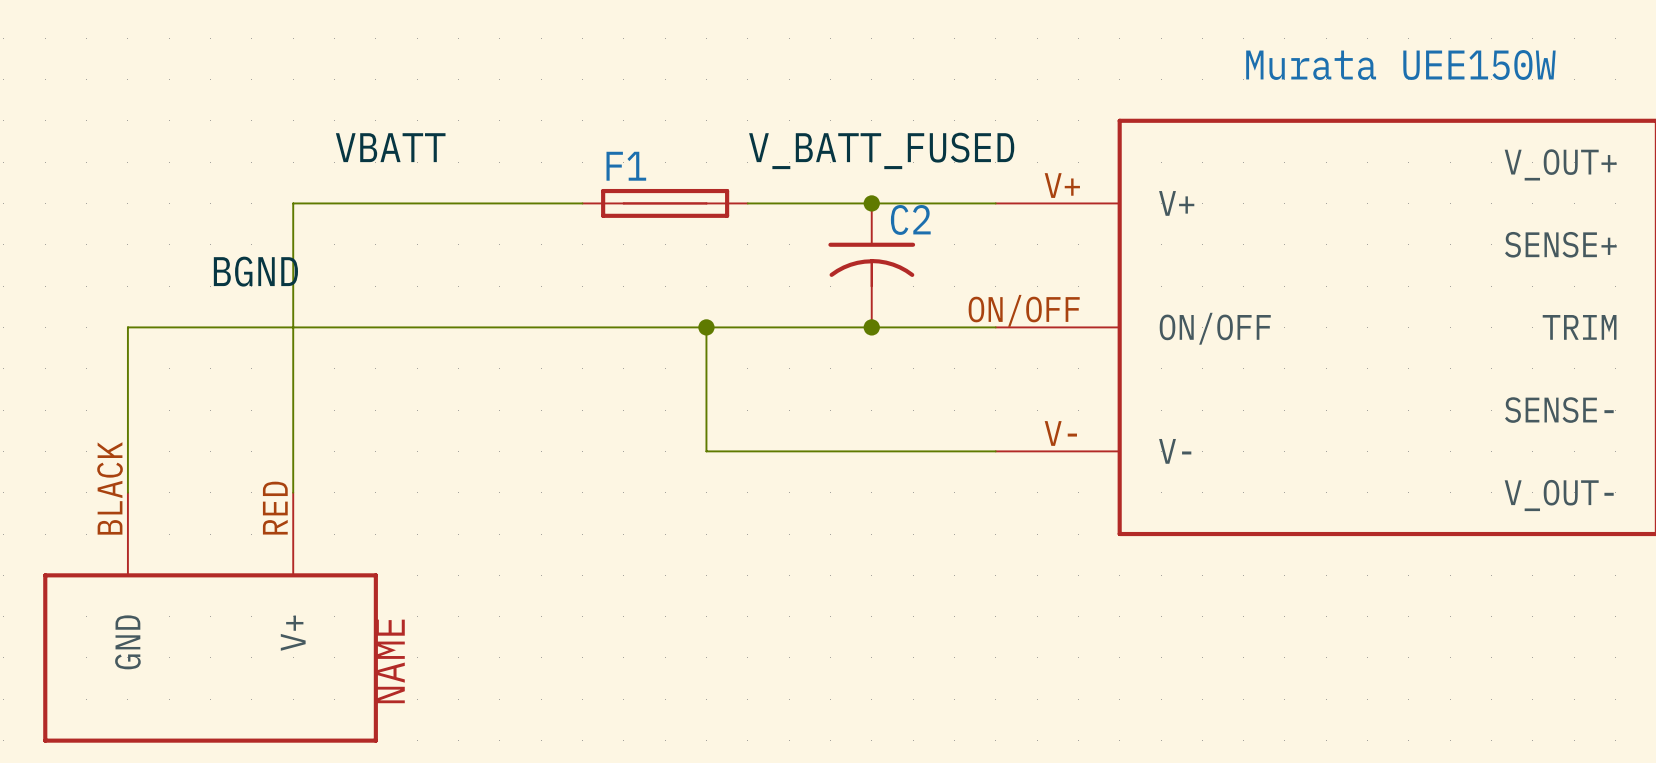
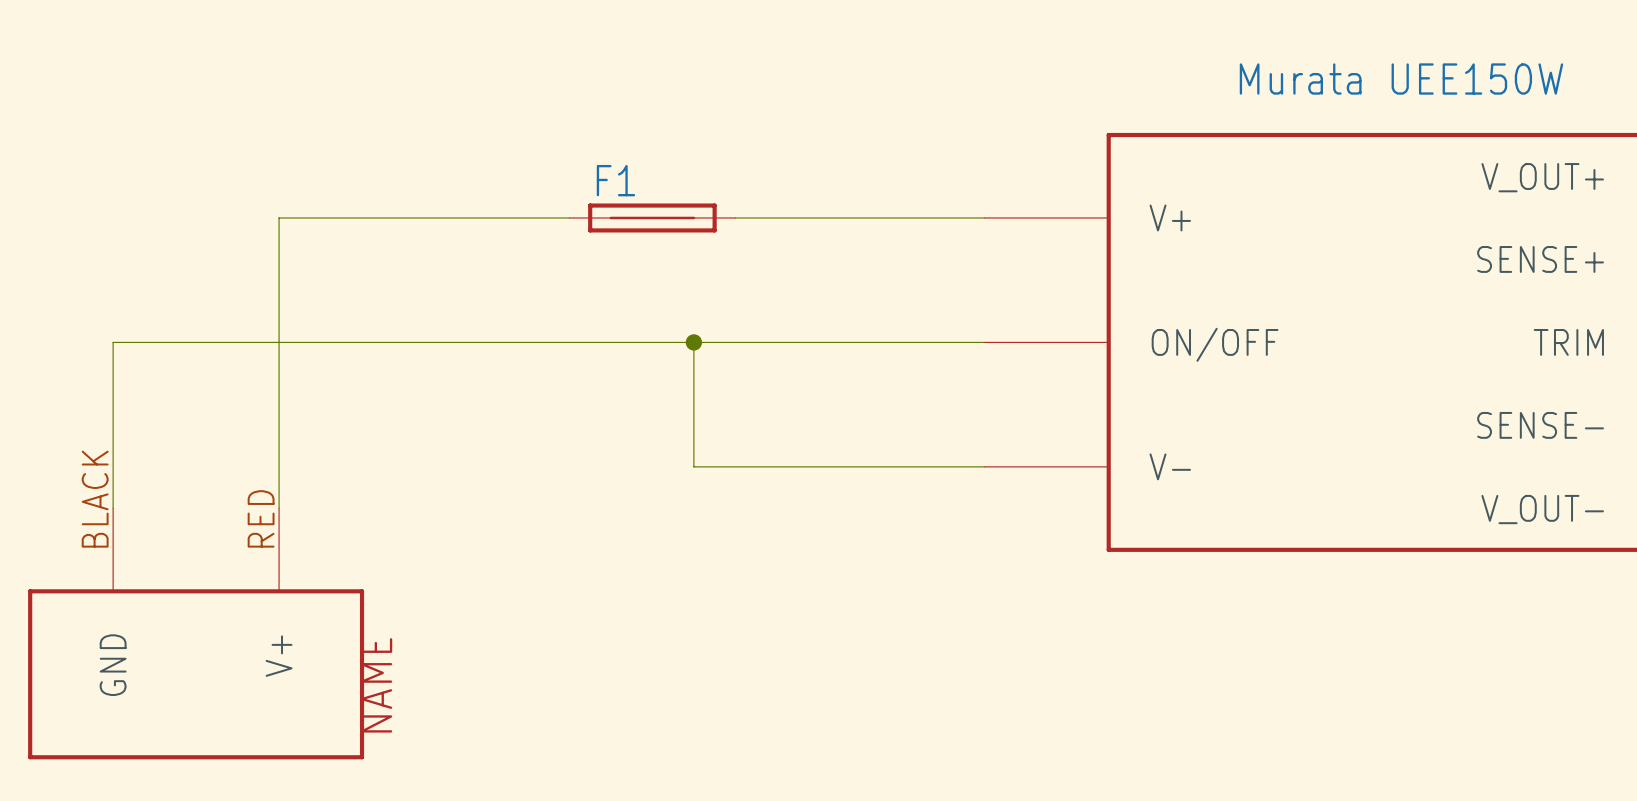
label: VBATT (390, 147) -> none
label: V_BATT_FUSED (881, 150) -> none
part pin number: V+ (1062, 185) -> none
junction: (871, 203) -> none
C2: (871, 265) -> none
label: BGND (255, 271) -> none
part pin number: ON/OFF (1024, 310) -> none
junction: (871, 327) -> none
part pin number: V- (1060, 433) -> none

